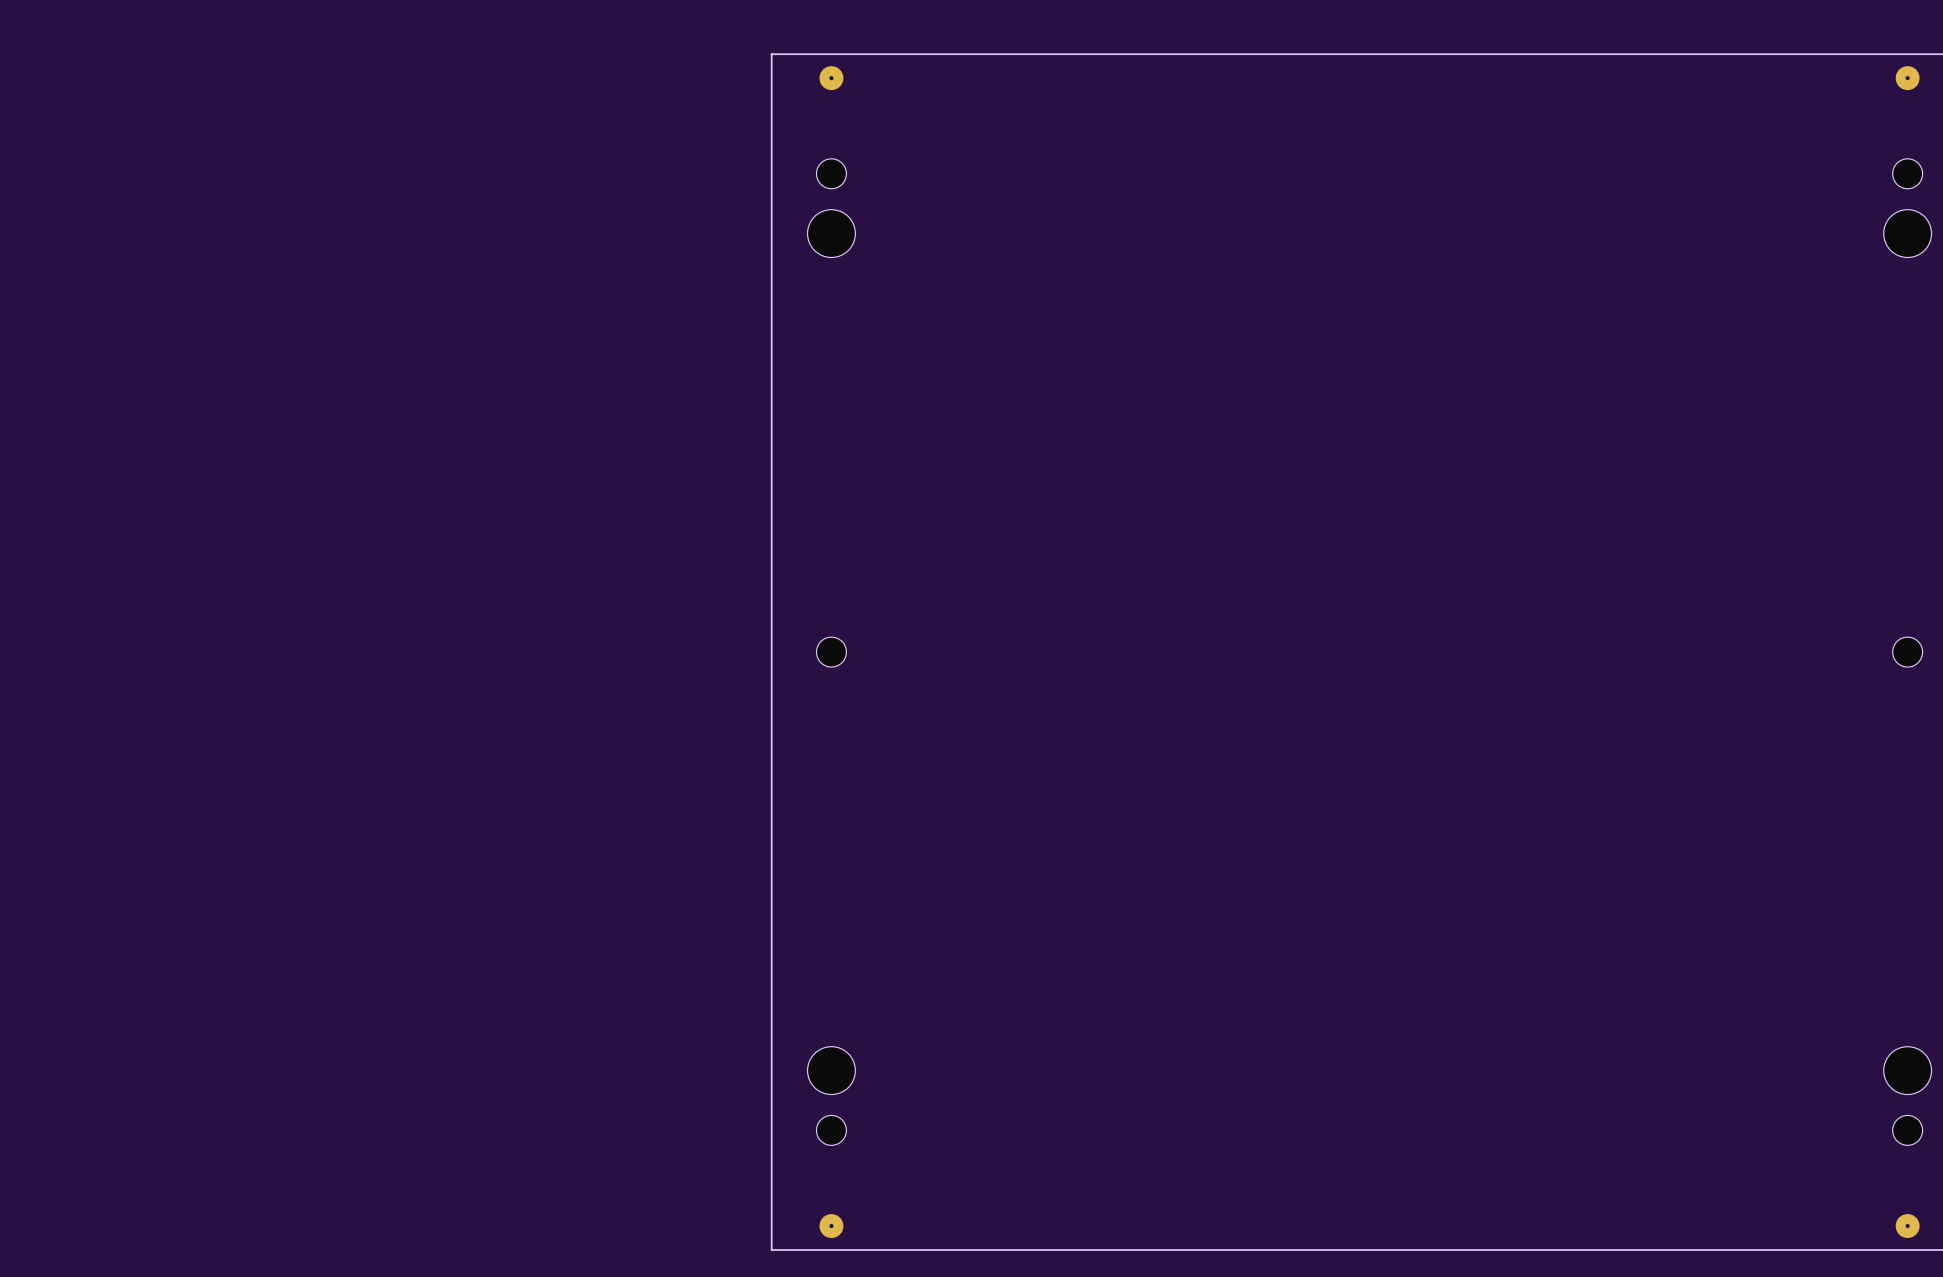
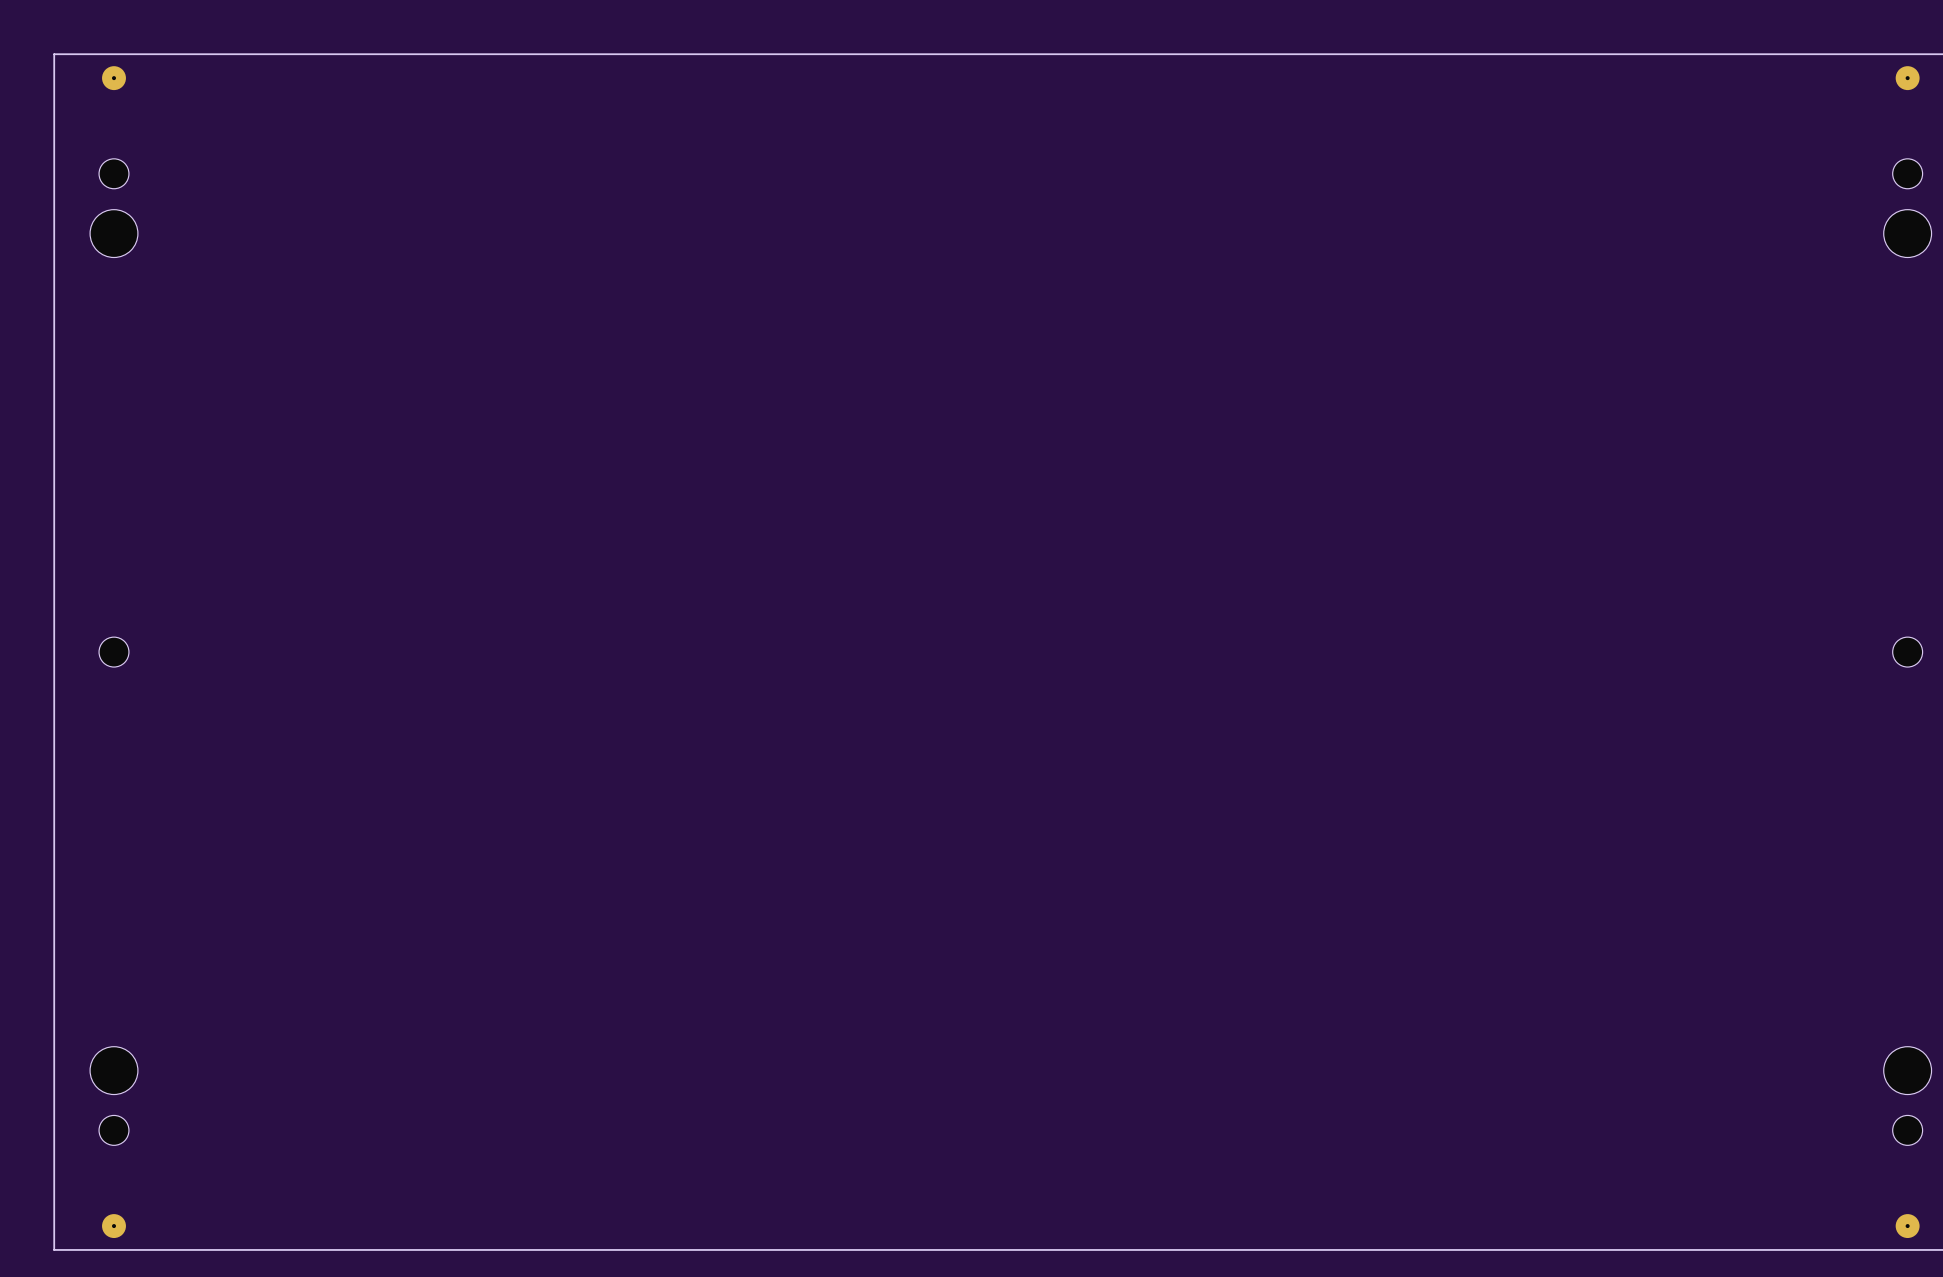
board edge: (771, 54) (771, 1249) -> (771, 54) (54, 54) (54, 1249) (771, 1249)
part: none -> (114, 78)
part: (831, 78) -> none
part: none -> (114, 173)
part: (831, 173) -> none
part: none -> (114, 233)
part: (831, 233) -> none
part: none -> (114, 652)
part: (831, 652) -> none
part: none -> (114, 1070)
part: (831, 1070) -> none
part: none -> (114, 1130)
part: (831, 1130) -> none
part: none -> (114, 1226)
part: (831, 1226) -> none

